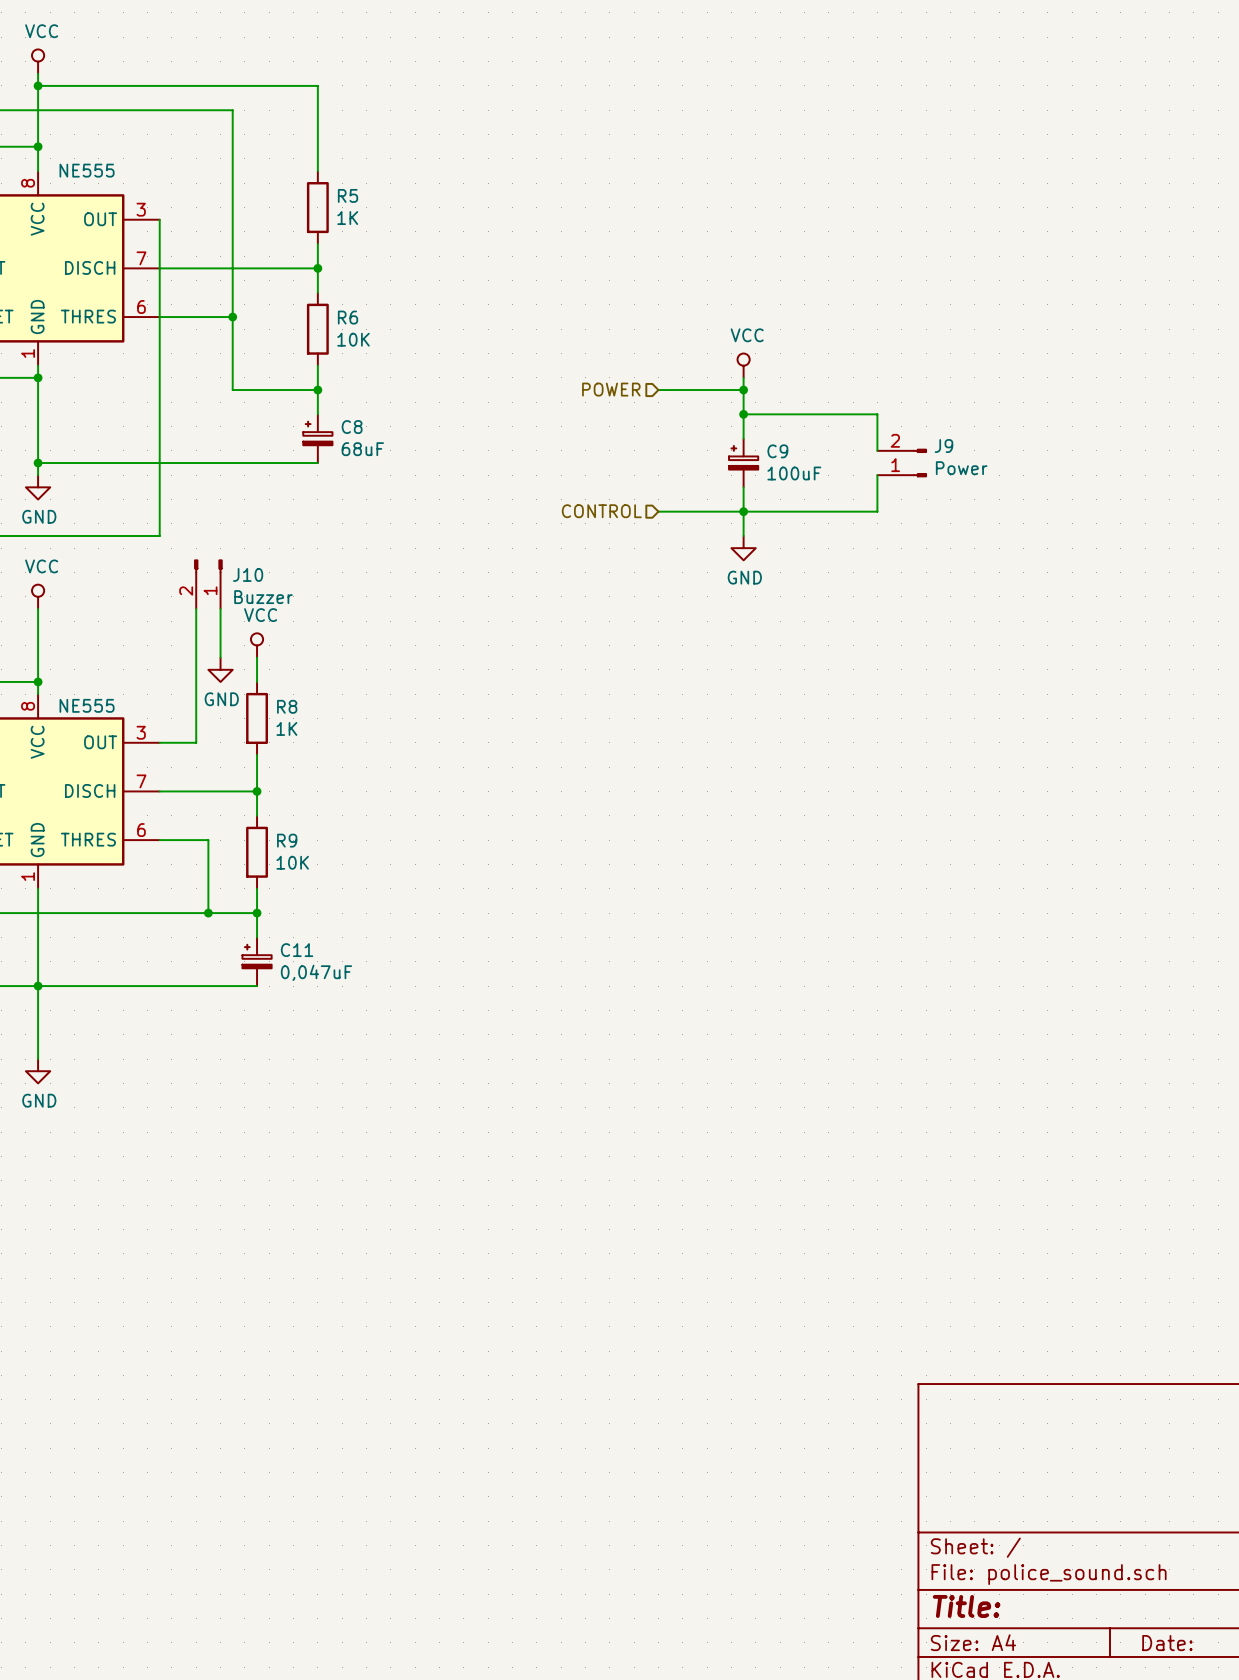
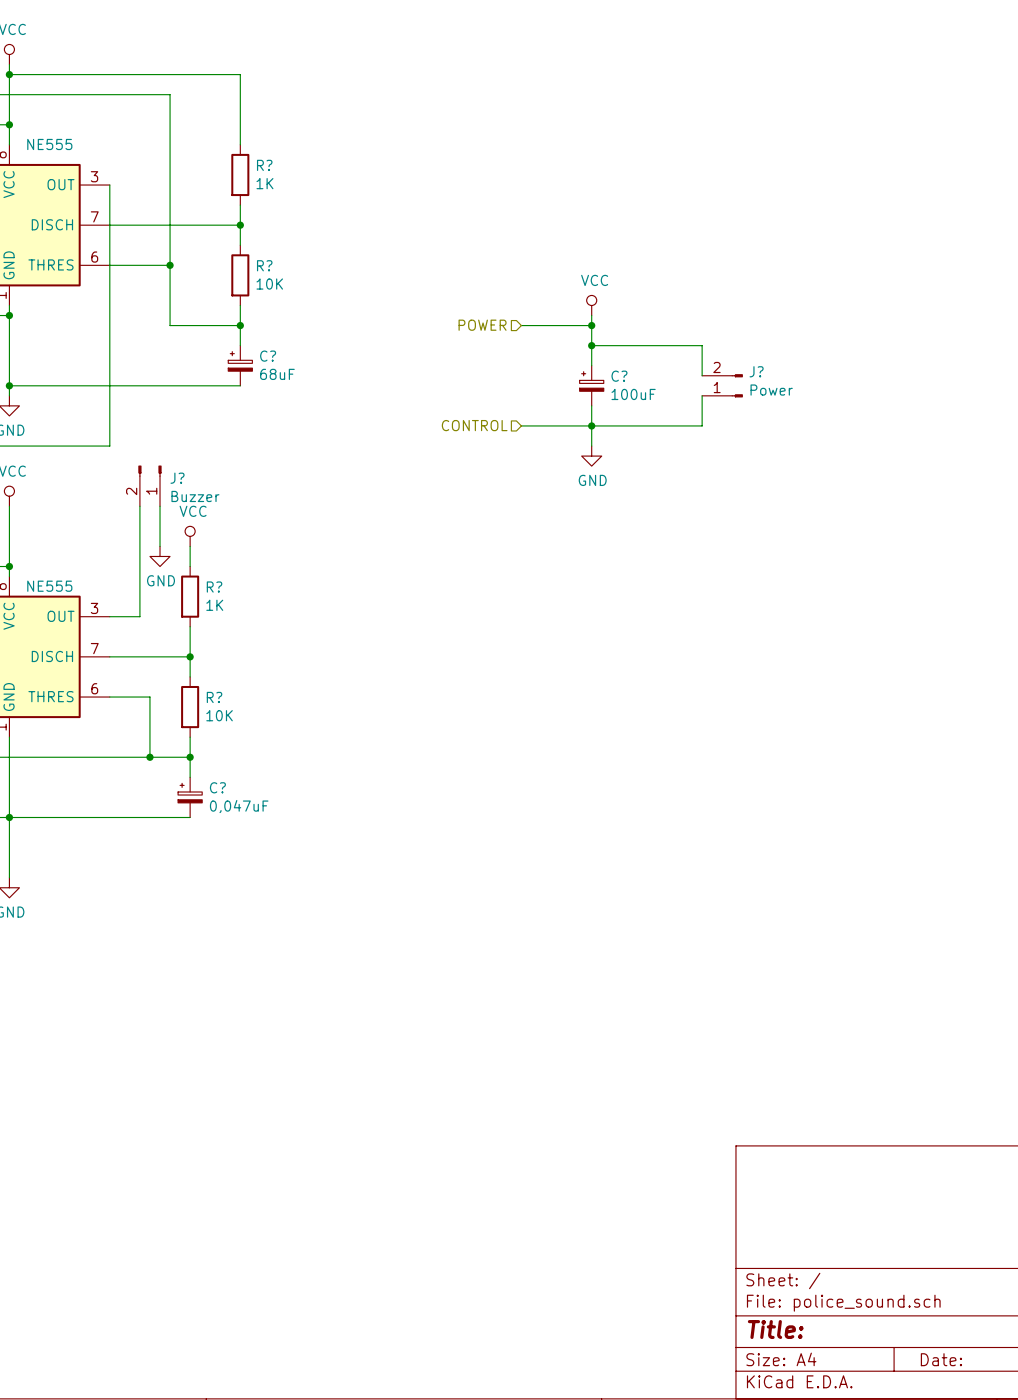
R5 name: R5 (348, 195) -> R? (264, 165)
R6 name: R6 (348, 317) -> R? (264, 265)
C8 name: C8 (352, 427) -> C? (268, 356)
J9 name: J9 (943, 446) -> J? (756, 371)
C9 name: C9 (777, 451) -> C? (619, 376)
J10 name: J10 (248, 574) -> J? (177, 478)
R8 name: R8 (287, 706) -> R? (214, 587)
R9 name: R9 (287, 840) -> R? (214, 697)
C11 name: C11 (297, 950) -> C? (217, 787)

